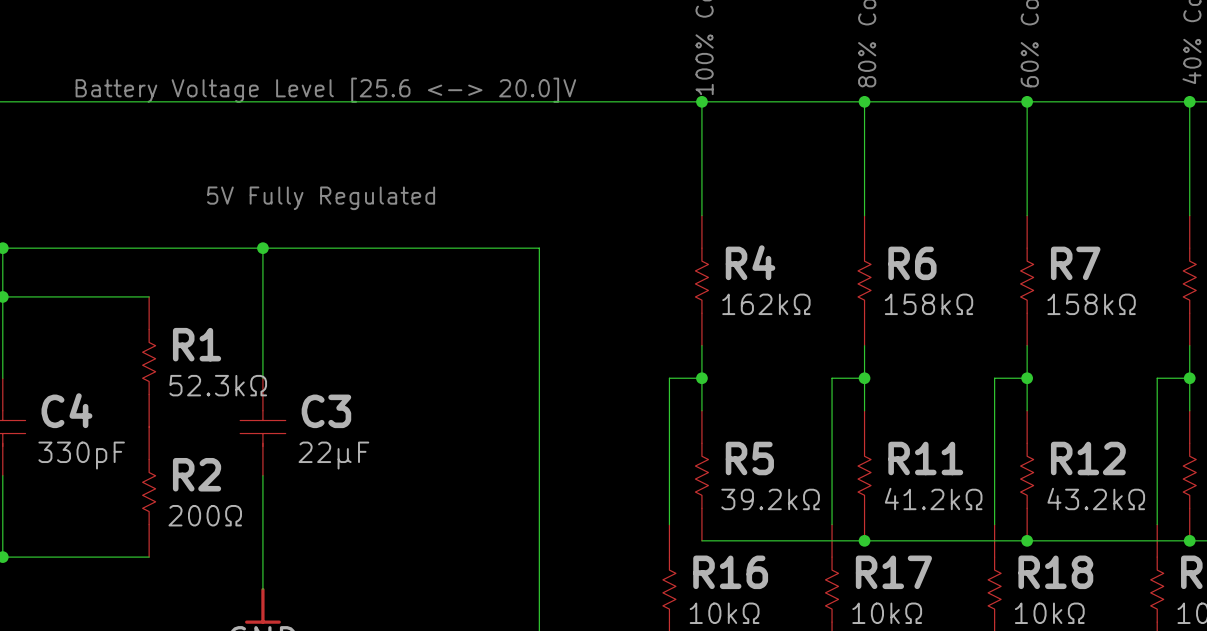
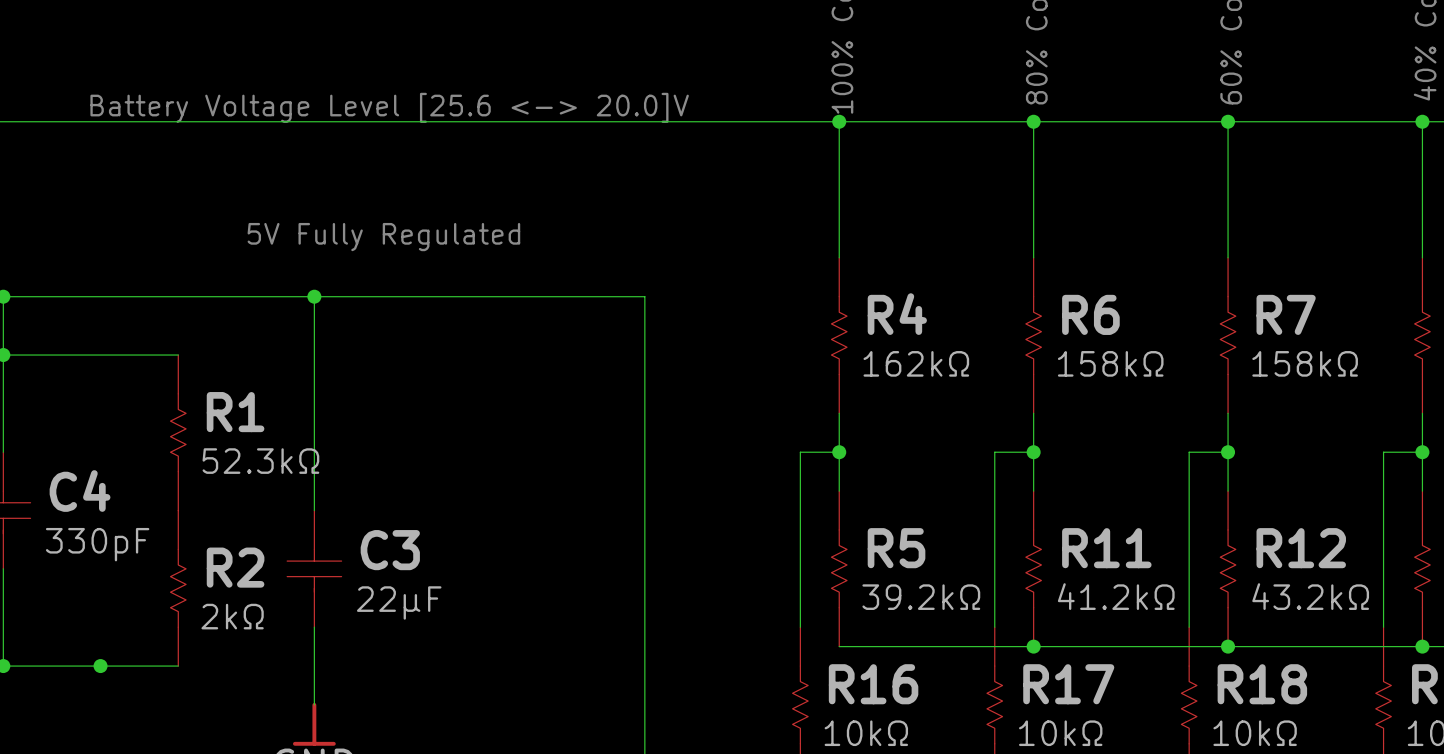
C3 position: (262, 427) -> (314, 568)
R2 value: 200Ω (205, 515) -> 2kΩ (232, 616)
junction: none -> (100, 666)

